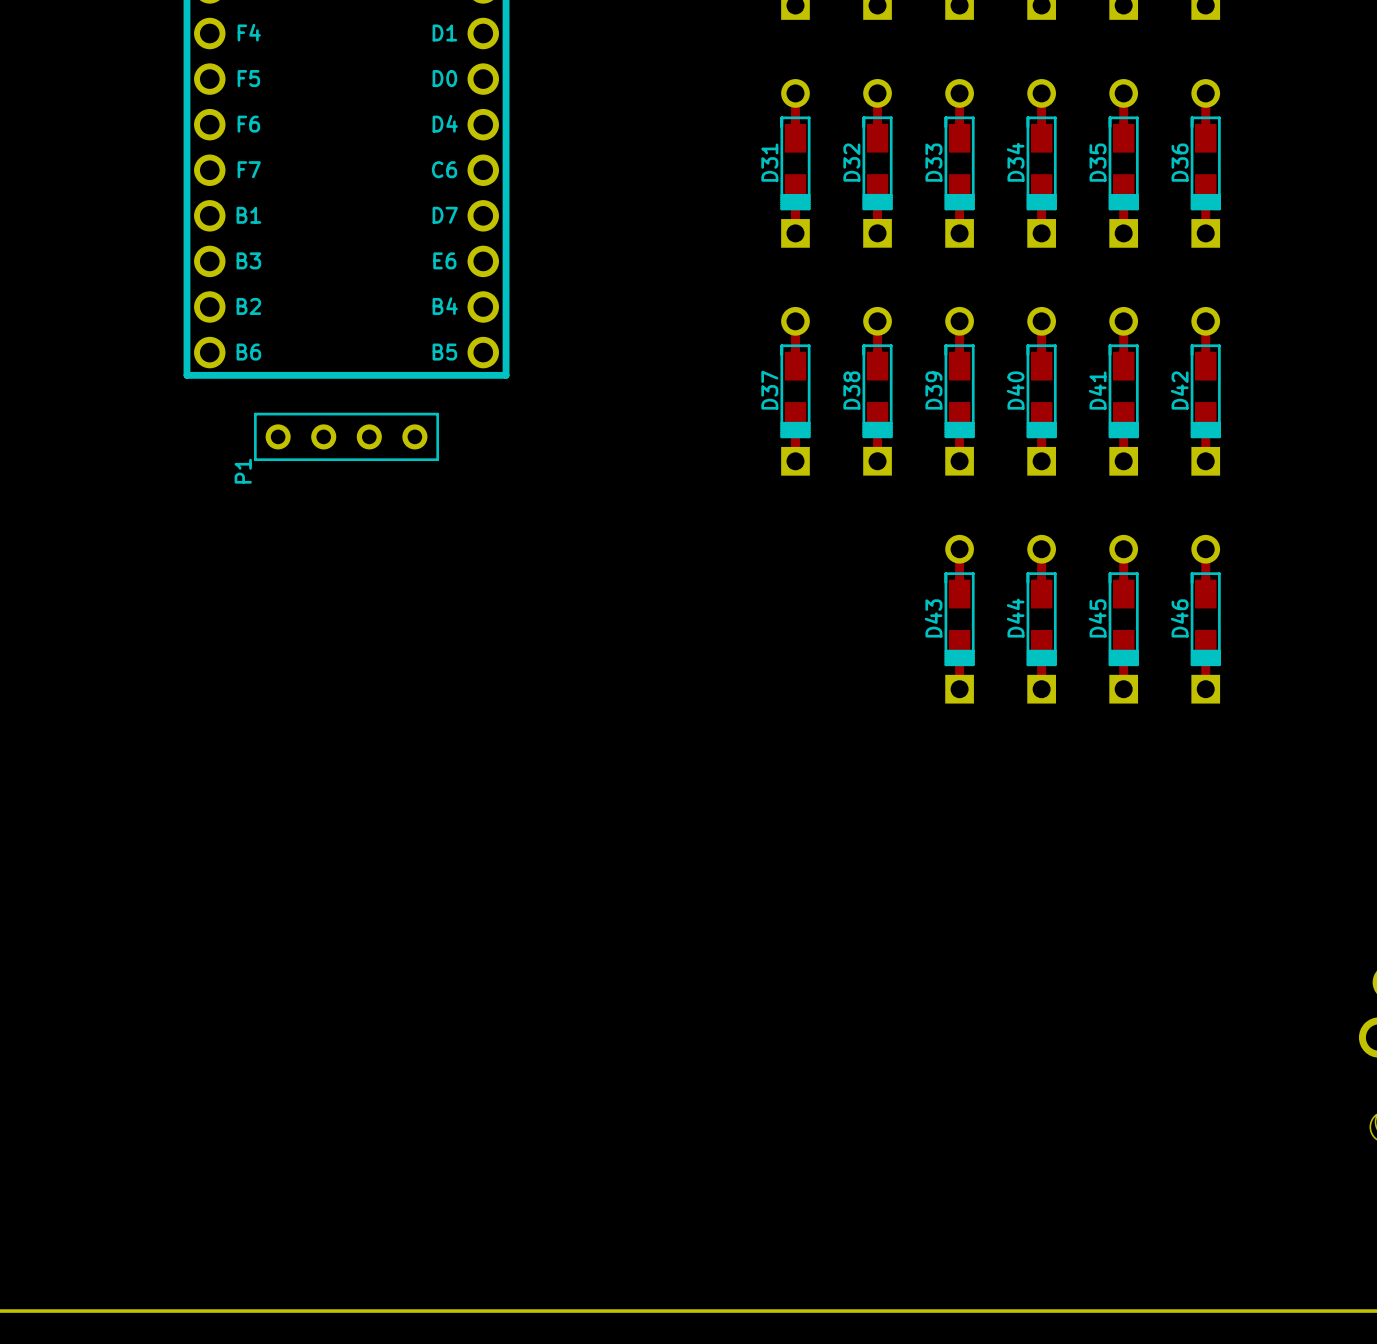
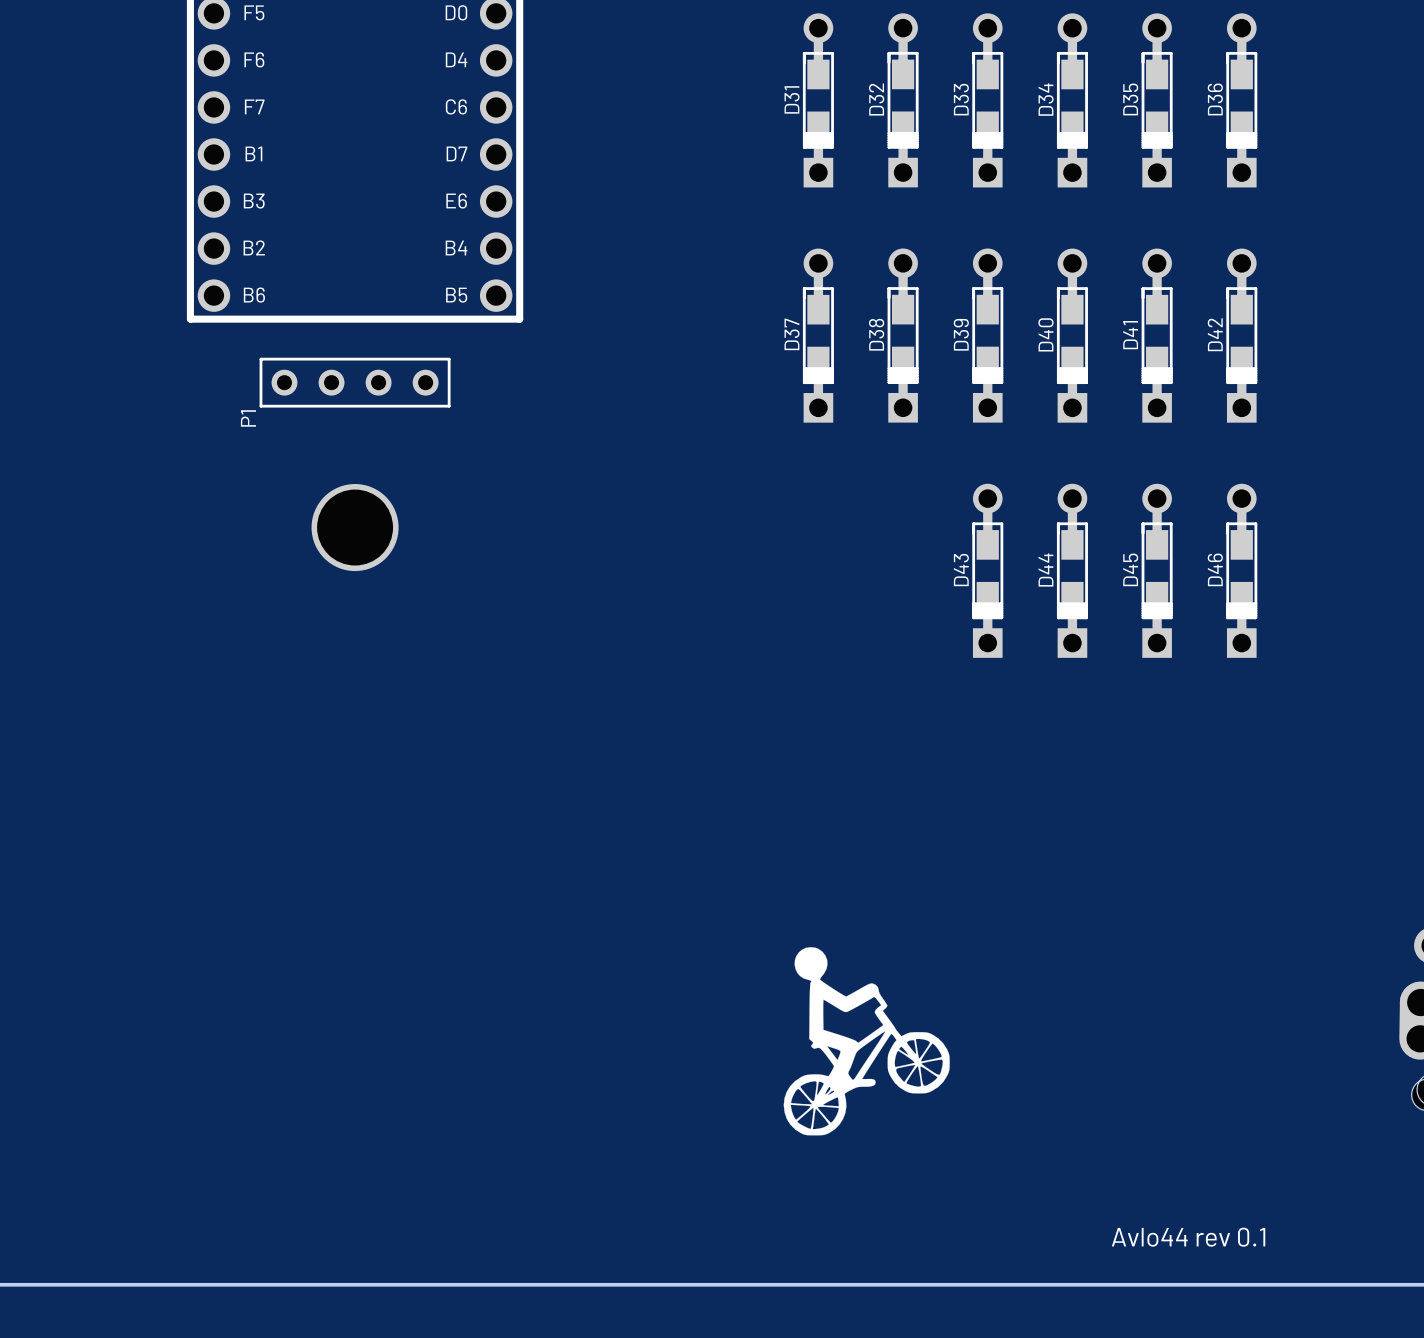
part: none -> (355, 527)
drawing: none -> [783, 947, 950, 1136]
text: none -> Avlo44 rev 0.1 (1188, 1237)

